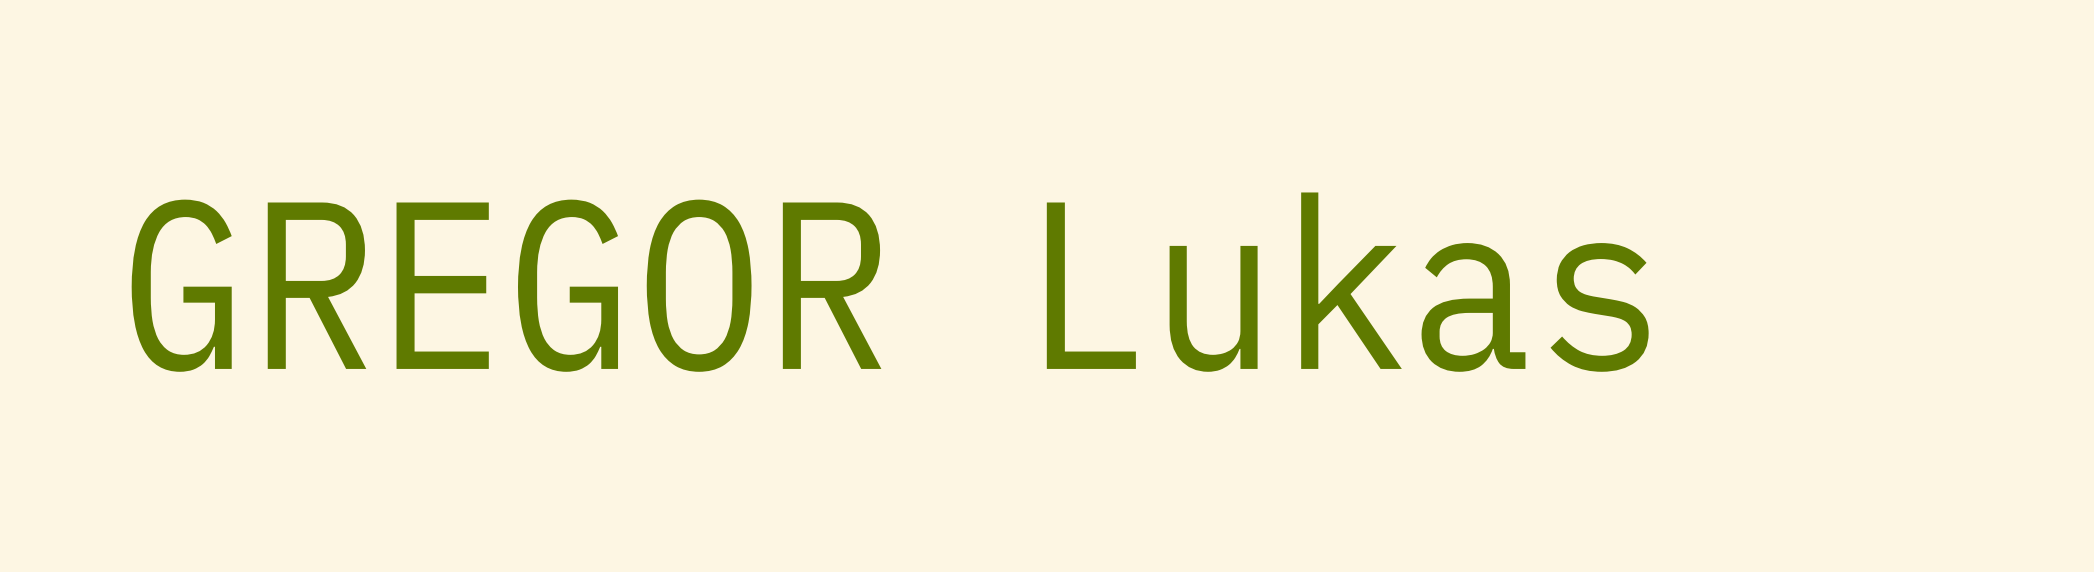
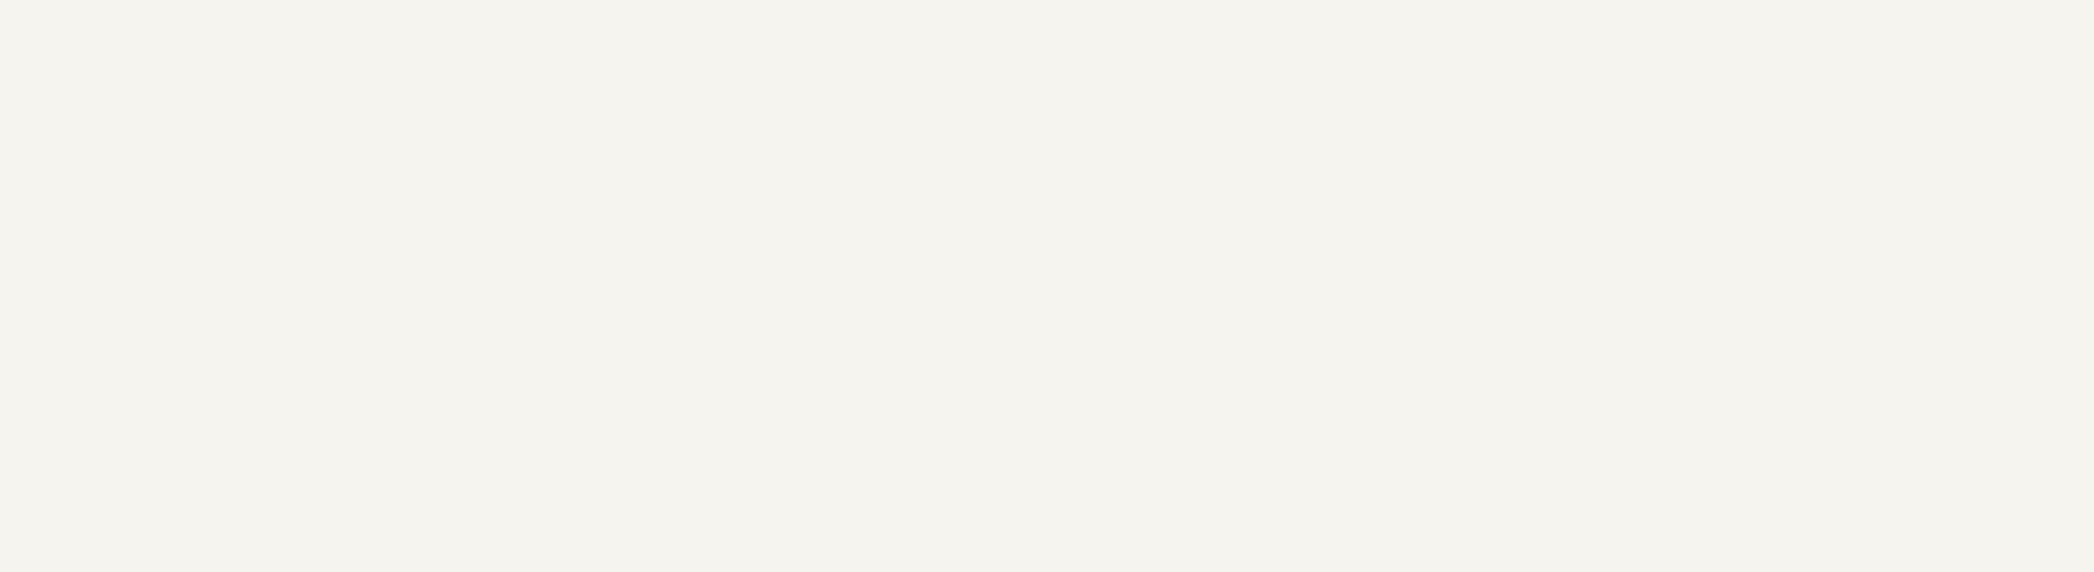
text: GREGOR Lukas (890, 282) -> none

